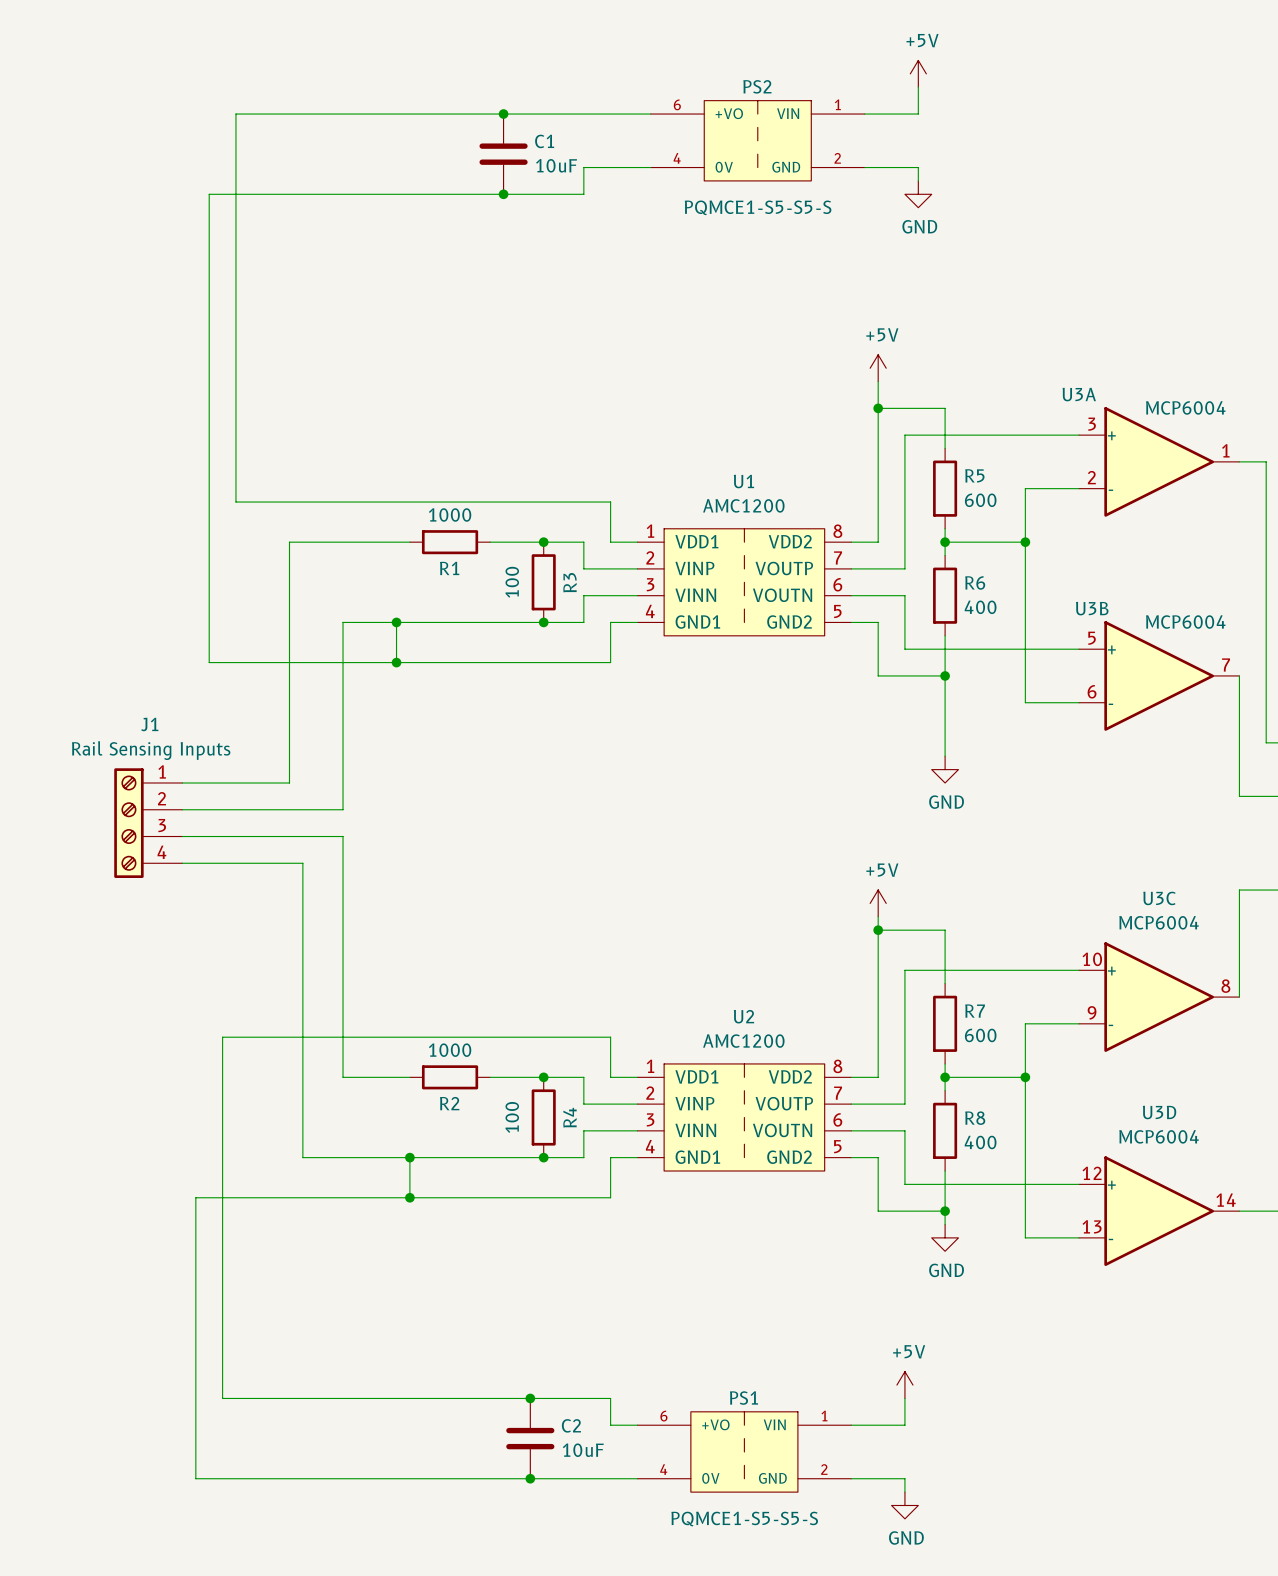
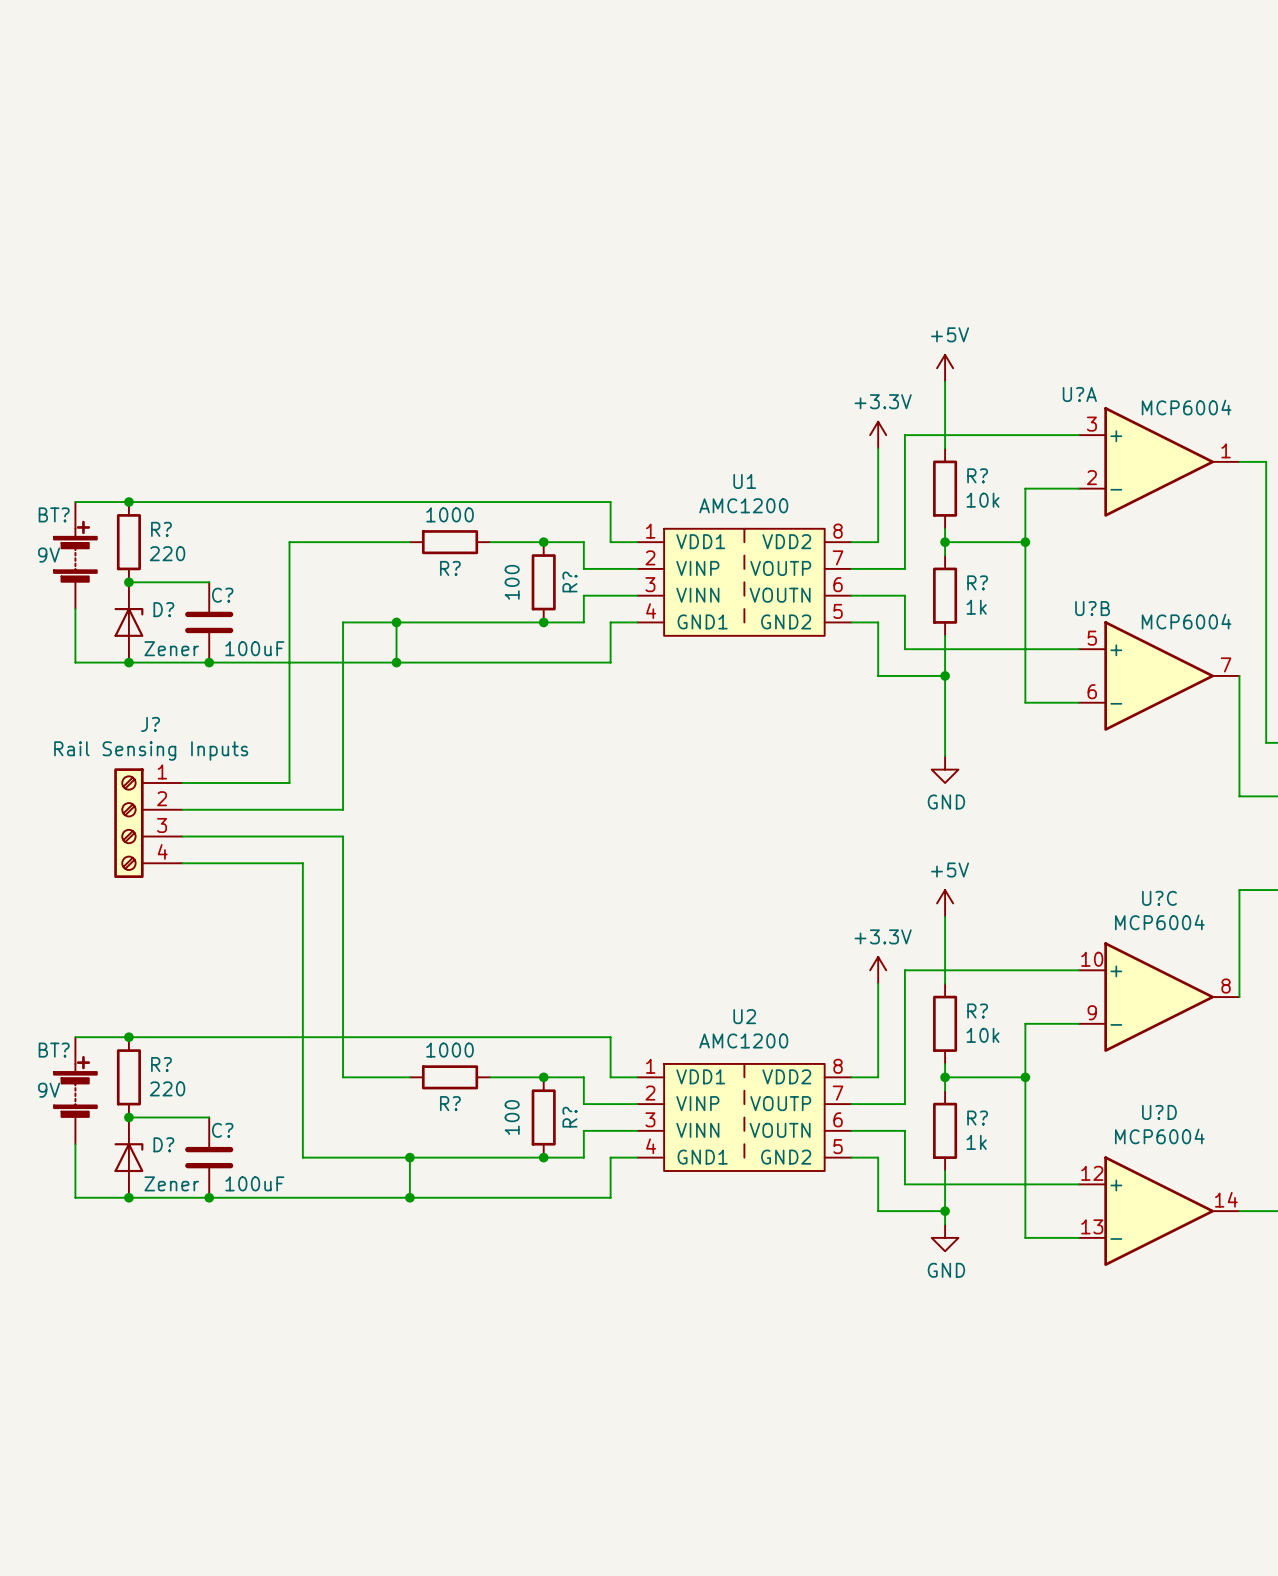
power symbol: +5V (918, 73) -> none
wire: (918, 87) (918, 114) (864, 114) -> none
junction: (503, 114) -> none
wire: (650, 114) (235, 114) (235, 502) -> (75, 502) (235, 502)
PS2: PQMCE1-S5-S5-S (757, 140) -> none
C1: 10uF (503, 154) -> none
wire: (650, 167) (583, 167) (583, 194) (209, 194) (209, 662) -> (75, 609) (75, 662) (209, 662)
wire: (864, 167) (918, 167) (918, 180) -> none
junction: (503, 194) -> none
power symbol: GND (918, 194) -> none
power symbol position: +5V (878, 368) -> +5V (945, 368)
wire: (878, 381) (878, 448) -> none
U3A name: U3A (1079, 394) -> U?A (1079, 394)
wire: (878, 408) (945, 408) -> (945, 381) (945, 408)
junction: (878, 408) -> none
power symbol: none -> +3.3V (878, 435)
R5 name: R5 (974, 475) -> R? (977, 475)
R5 value: 600 (980, 500) -> 10k (983, 500)
junction: none -> (128, 502)
R?: none -> 220 (128, 542)
BT?: none -> 9V (75, 555)
R1 name: R1 (449, 568) -> R? (450, 568)
wire: none -> (128, 582) (209, 582)
junction: none -> (128, 582)
R3 name: R3 (570, 582) -> R? (569, 581)
R6 name: R6 (975, 582) -> R? (977, 582)
R6 value: 400 (980, 607) -> 1k (976, 607)
U3B name: U3B (1092, 608) -> U?B (1092, 608)
D?: none -> Zener (128, 622)
C?: none -> 100uF (209, 622)
junction: none -> (128, 662)
junction: none -> (209, 662)
J1 name: J1 (149, 724) -> J? (150, 724)
U3C name: U3C (1159, 898) -> U?C (1159, 898)
power symbol position: +5V (878, 903) -> +5V (945, 903)
wire: (878, 916) (878, 983) -> none
wire: (878, 930) (945, 930) -> (945, 916) (945, 930)
junction: (878, 930) -> none
power symbol: none -> +3.3V (878, 970)
R7 name: R7 (975, 1011) -> R? (977, 1011)
R7 value: 600 (980, 1035) -> 10k (983, 1035)
junction: none -> (128, 1037)
wire: (222, 1037) (222, 1398) (610, 1398) (610, 1425) (637, 1425) -> (222, 1037) (75, 1037)
R?: none -> 220 (128, 1077)
BT?: none -> 9V (75, 1090)
R2 name: R2 (449, 1103) -> R? (450, 1103)
U3D name: U3D (1159, 1112) -> U?D (1159, 1112)
wire: none -> (128, 1117) (209, 1117)
junction: none -> (128, 1117)
R4 name: R4 (569, 1117) -> R? (569, 1117)
R8 name: R8 (975, 1118) -> R? (977, 1118)
R8 value: 400 (980, 1142) -> 1k (976, 1142)
D?: none -> Zener (128, 1157)
C?: none -> 100uF (209, 1157)
junction: none -> (128, 1197)
wire: (195, 1197) (195, 1478) (637, 1478) -> (195, 1197) (75, 1197) (75, 1144)
junction: none -> (209, 1197)
power symbol: +5V (904, 1385) -> none
junction: (530, 1398) -> none
wire: (904, 1398) (904, 1425) (851, 1425) -> none
C2: 10uF (530, 1438) -> none
PS1: PQMCE1-S5-S5-S (744, 1451) -> none
junction: (530, 1478) -> none
wire: (851, 1478) (904, 1478) (904, 1492) -> none
power symbol: GND (904, 1505) -> none

